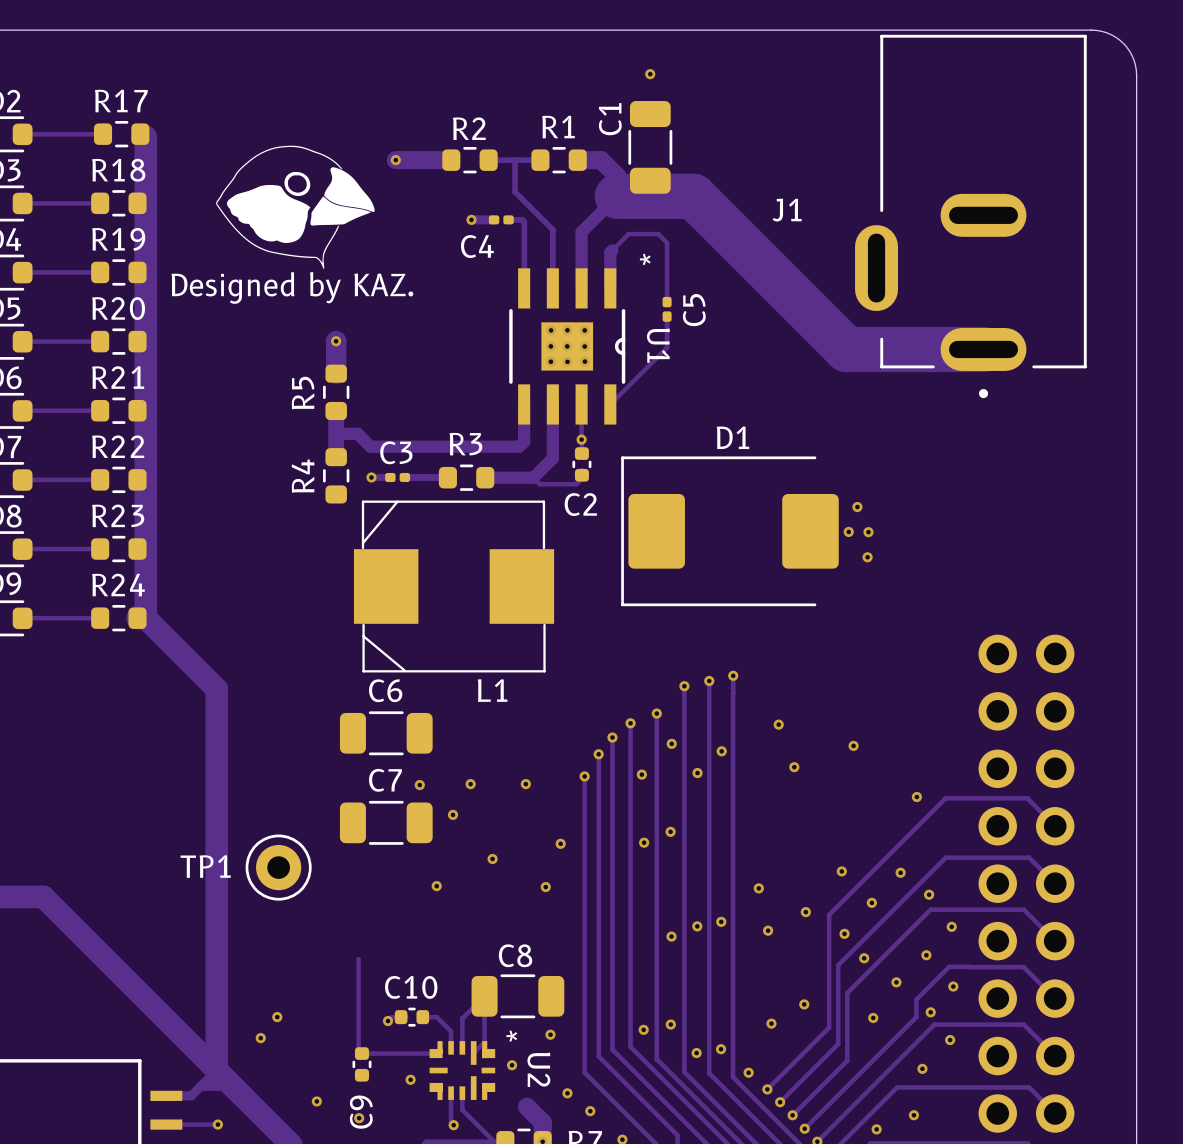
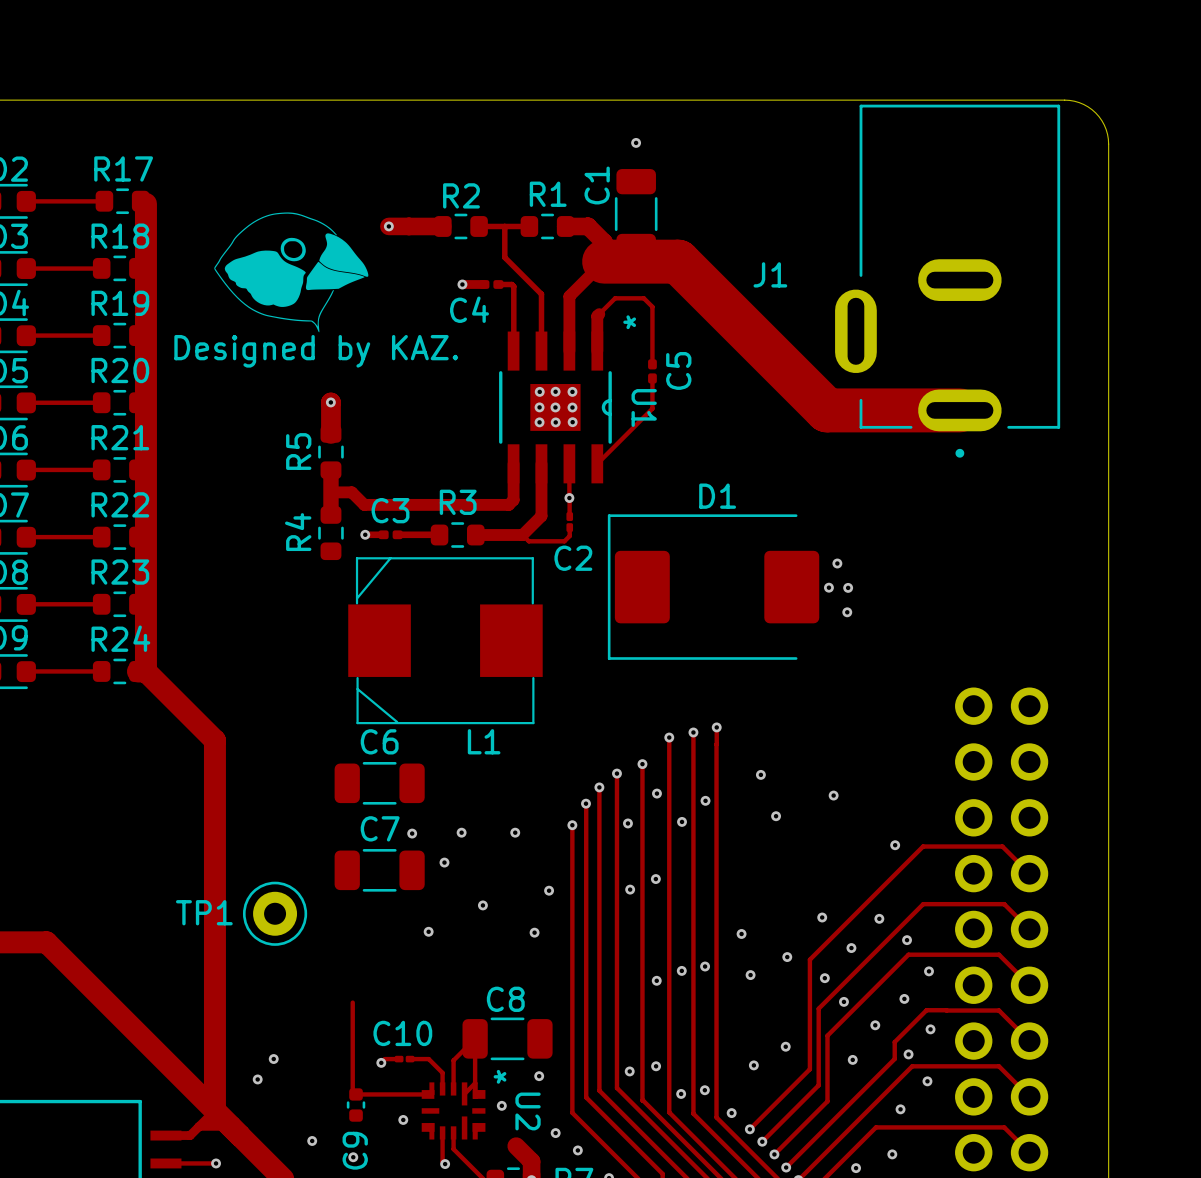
C2 footprint: [572, 447, 592, 482] -> [566, 512, 574, 532]
C10 footprint: [394, 1007, 430, 1027] -> [394, 1055, 415, 1063]

